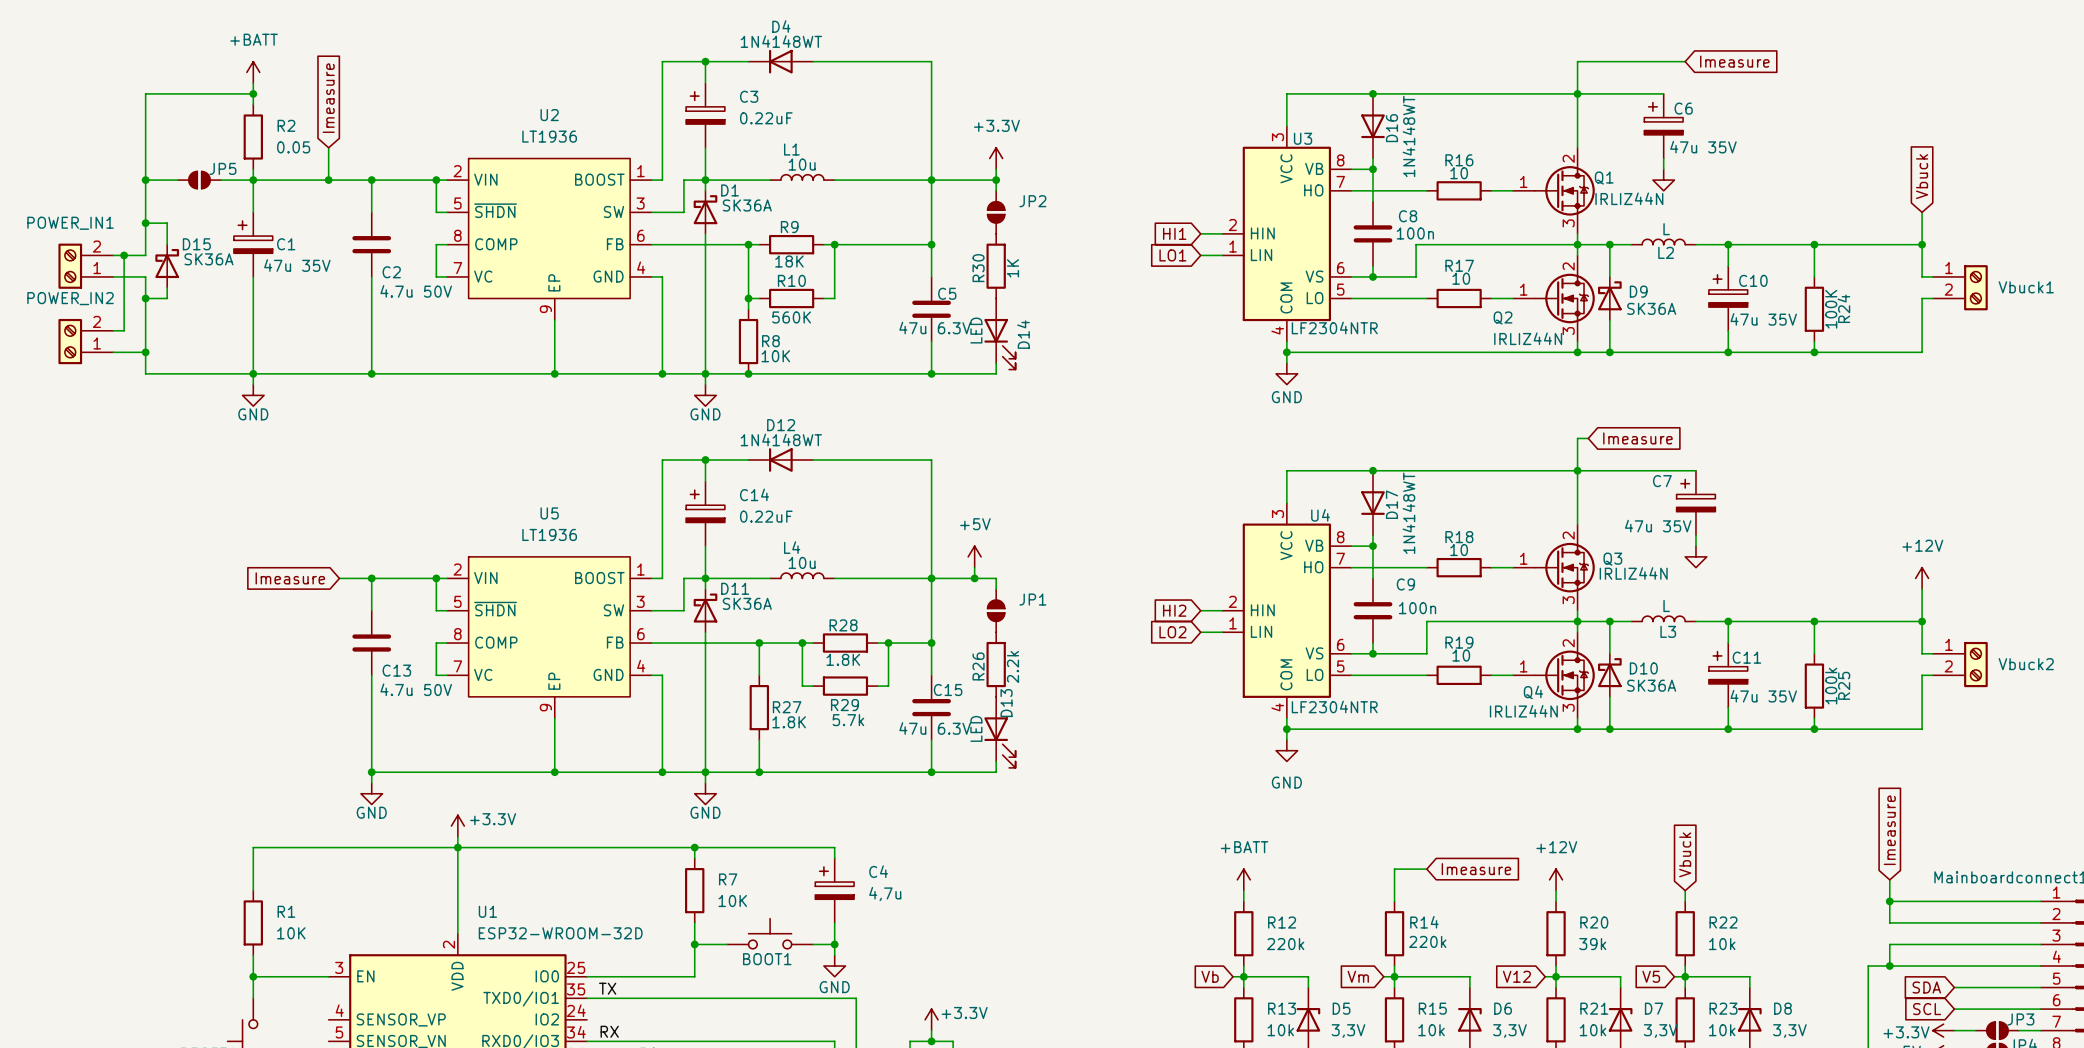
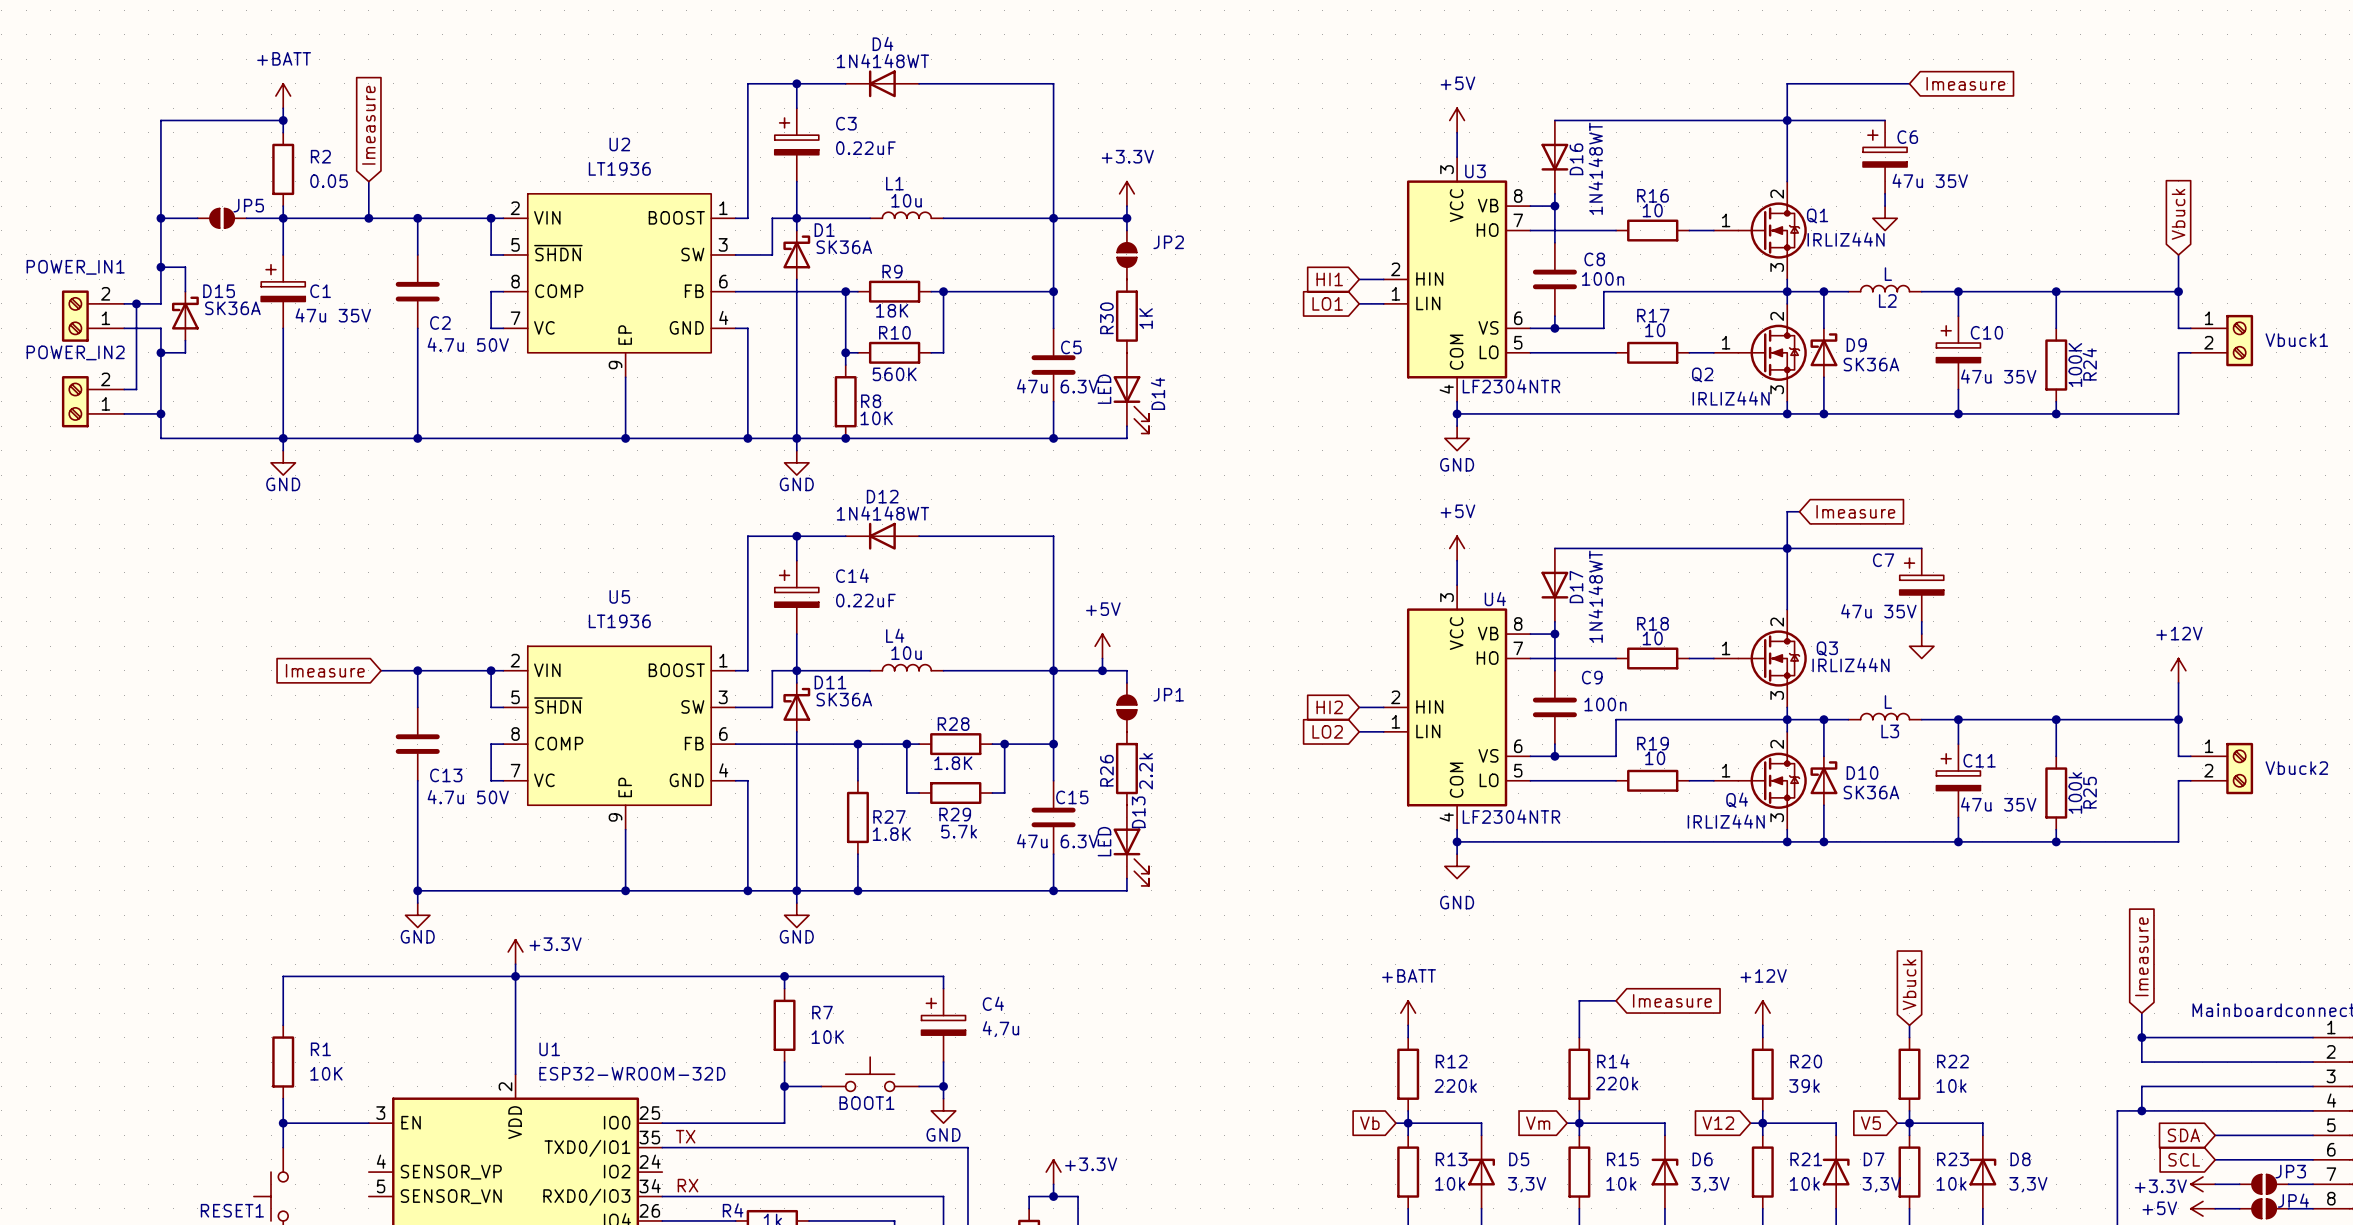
power symbol: none -> +5V (1457, 120)
wire: (1373, 93) (1286, 93) (1286, 104) -> none
junction: (1373, 93) -> none
power symbol: none -> +5V (1457, 548)
wire: (1373, 470) (1286, 470) (1286, 481) -> none
junction: (1373, 470) -> none

